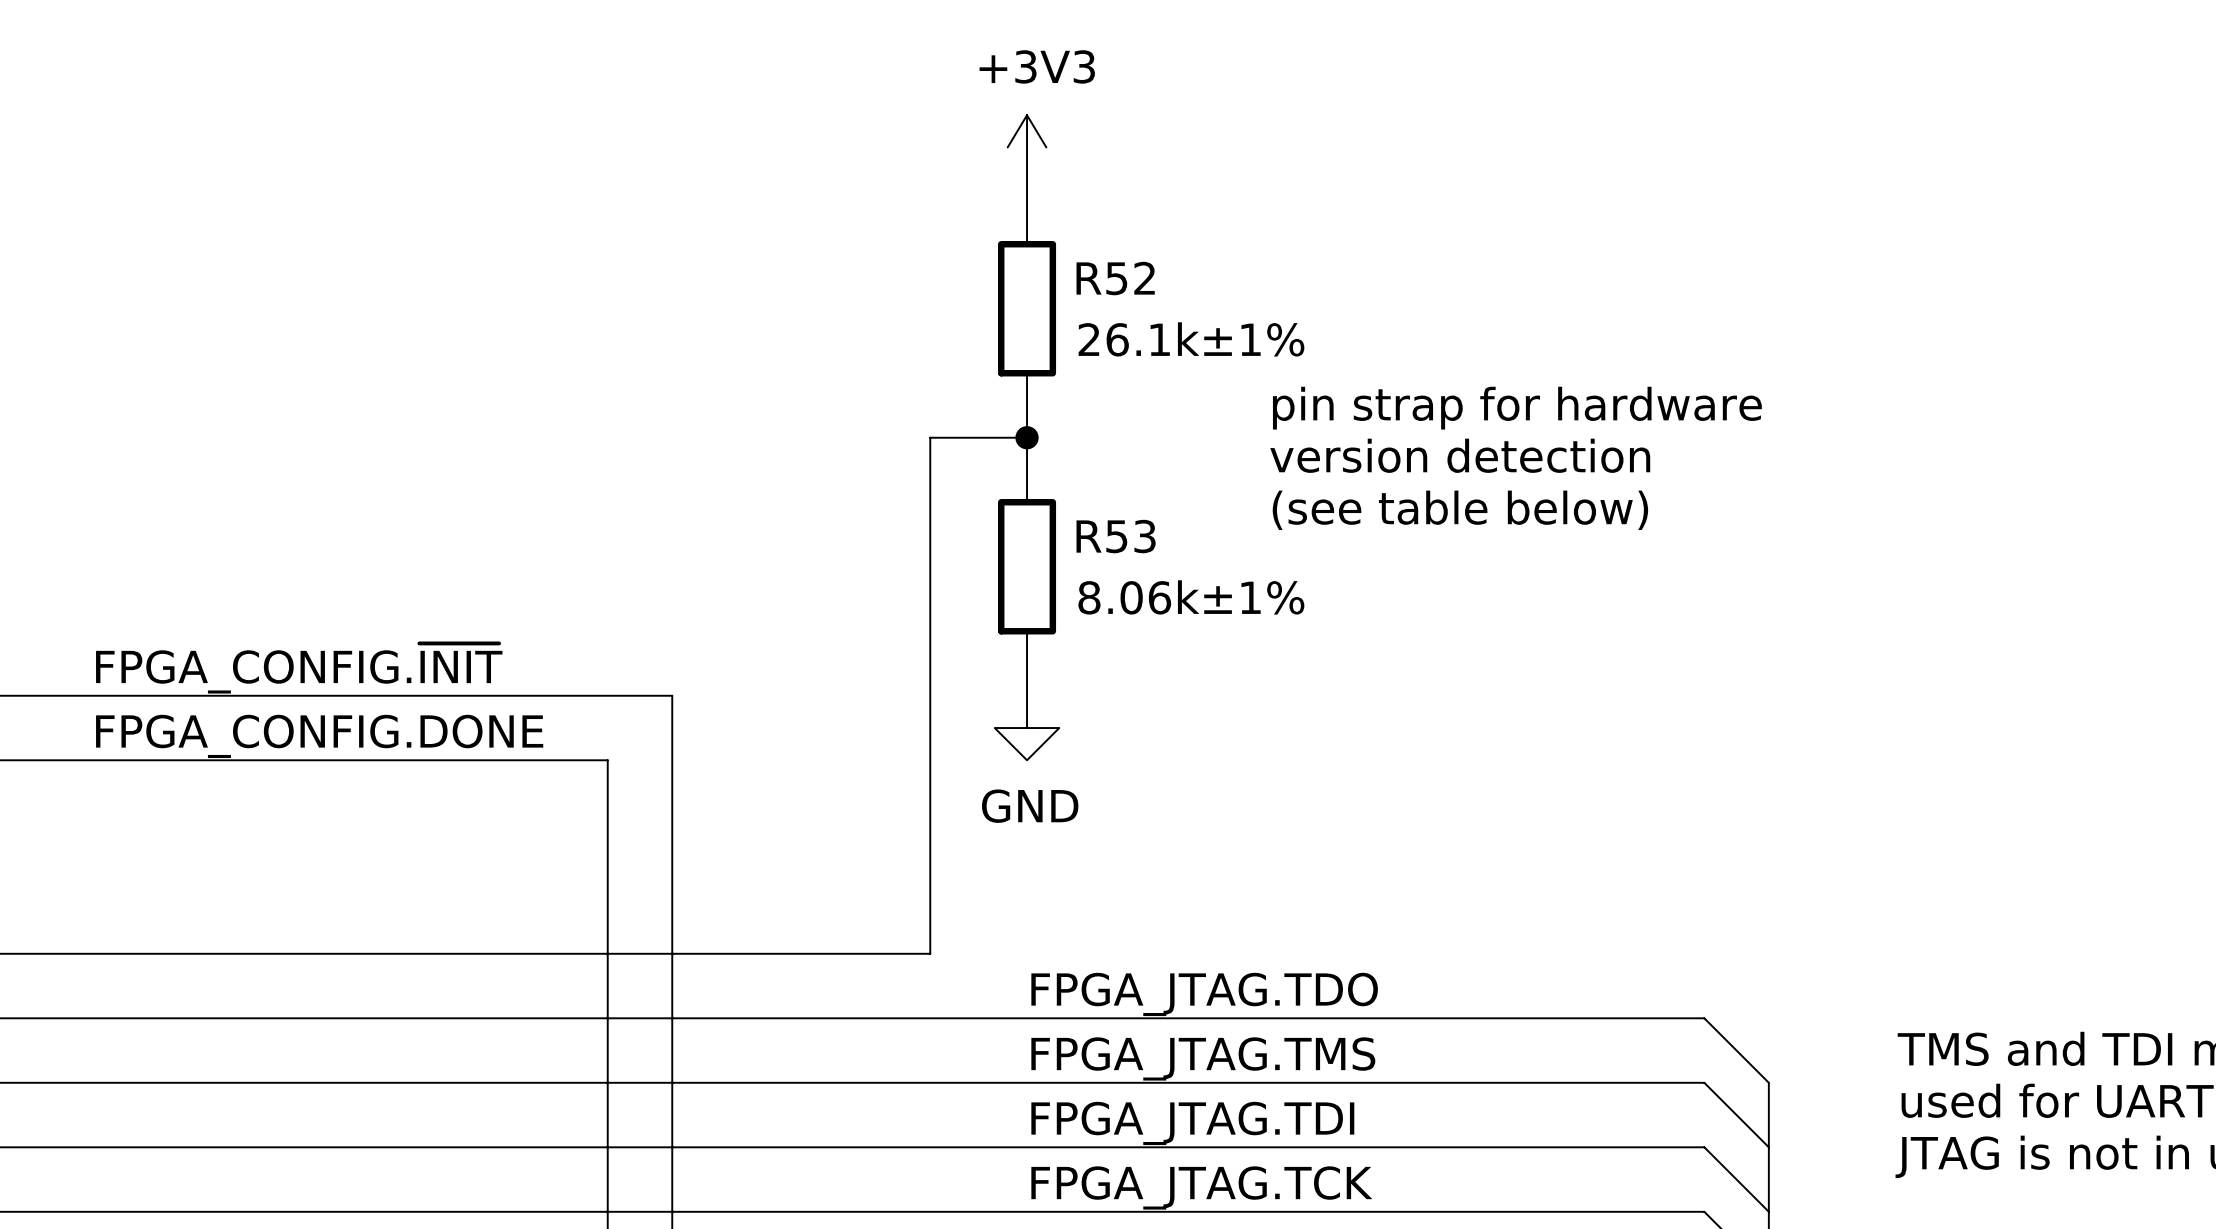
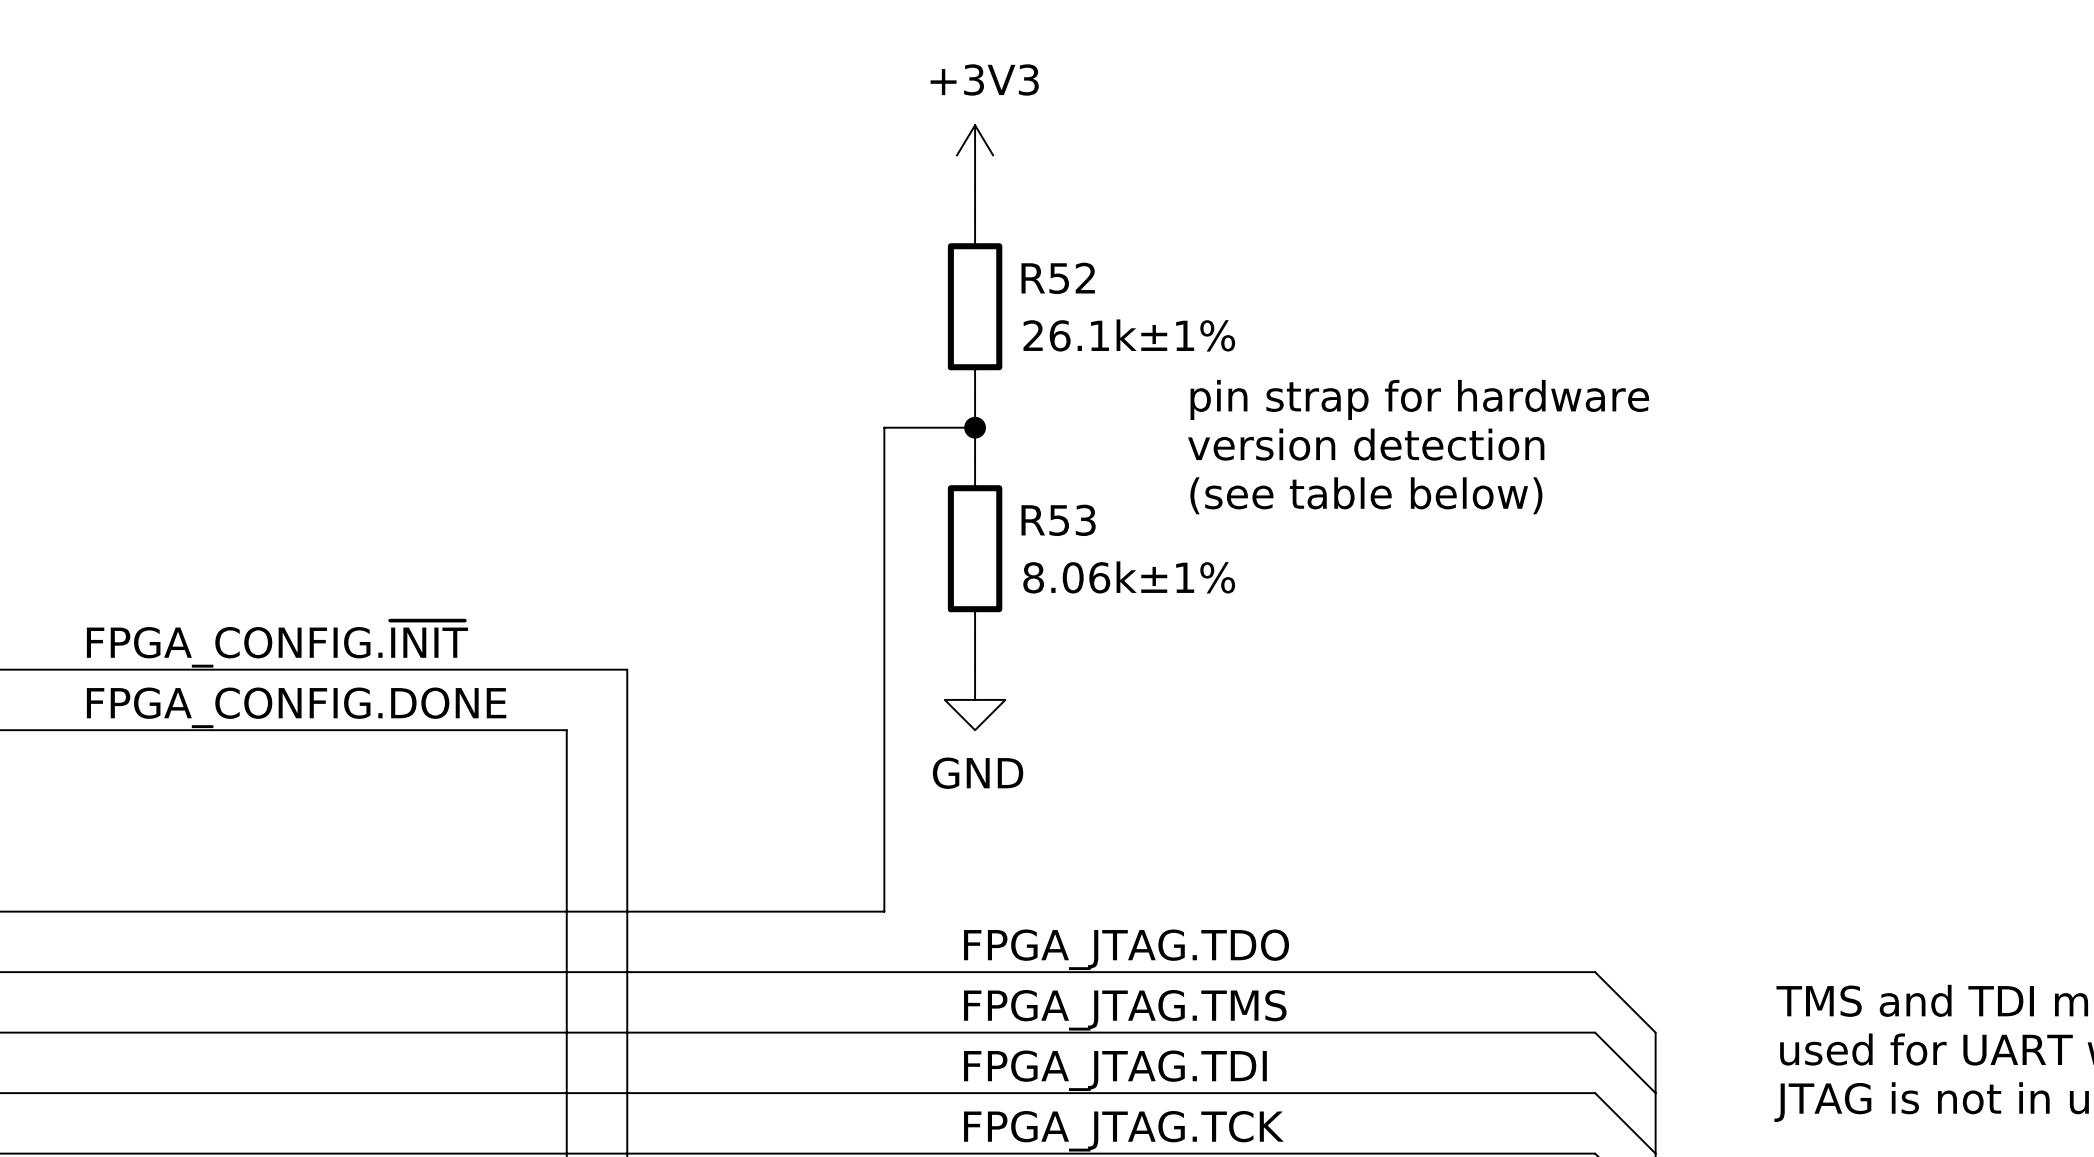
power symbol position: +3V3 (1027, 147) -> +3V3 (975, 155)
wire: (1027, 179) (1027, 211) -> (975, 185) (975, 215)
R52 position: (1027, 308) -> (975, 306)
wire: (1027, 405) (1027, 469) -> (975, 397) (975, 457)
wire: (946, 437) (930, 437) (930, 953) -> (884, 427) (884, 911) (869, 911)
junction position: (1027, 437) -> (975, 427)
R53 position: (1027, 566) -> (975, 548)
wire: (1027, 663) (1027, 695) -> (975, 639) (975, 669)
power symbol position: GND (1027, 728) -> GND (975, 699)

